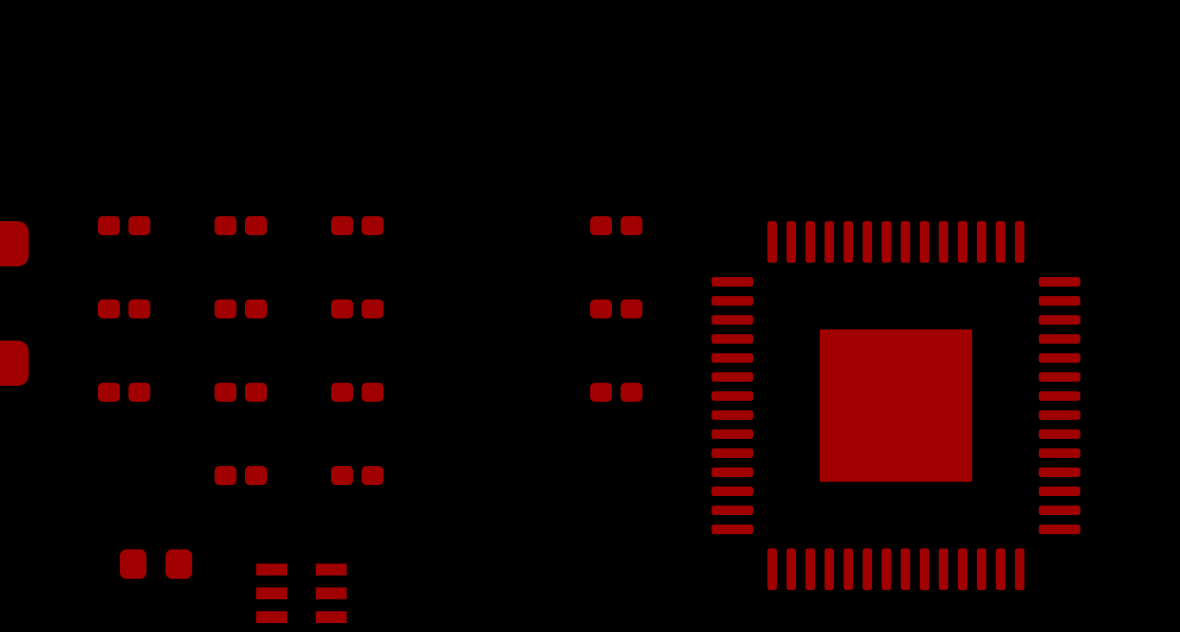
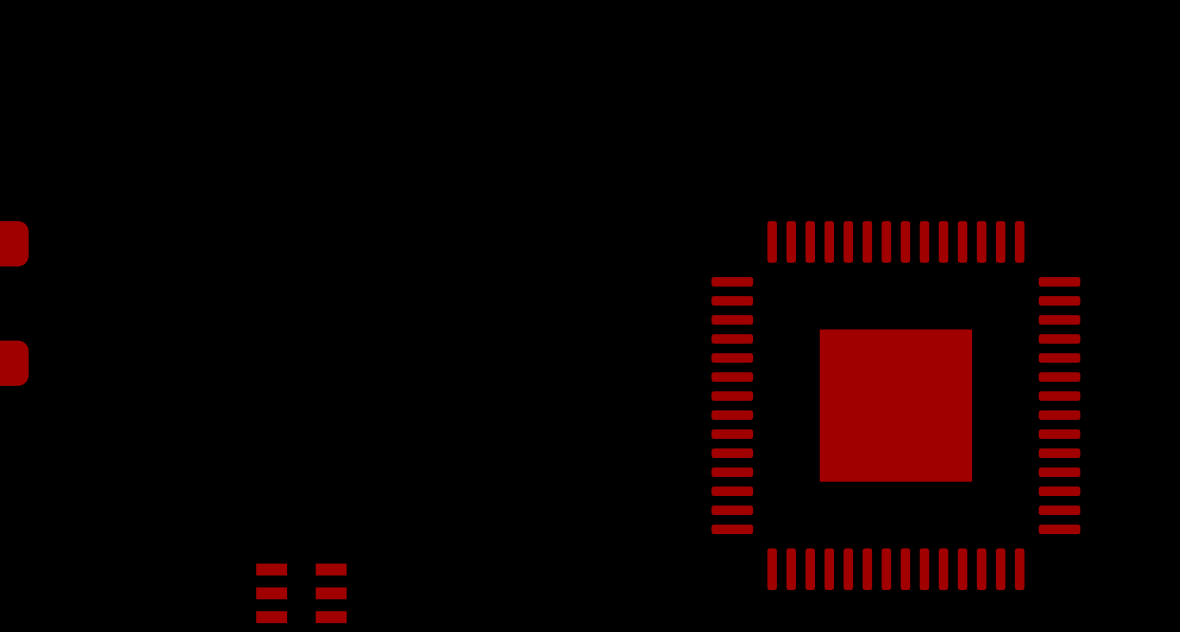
part: (124, 225) -> none
part: (240, 225) -> none
part: (357, 225) -> none
part: (616, 225) -> none
part: (124, 308) -> none
part: (240, 308) -> none
part: (357, 308) -> none
part: (616, 308) -> none
part: (124, 392) -> none
part: (240, 392) -> none
part: (357, 392) -> none
part: (616, 392) -> none
part: (240, 475) -> none
part: (357, 475) -> none
part: (156, 564) -> none

